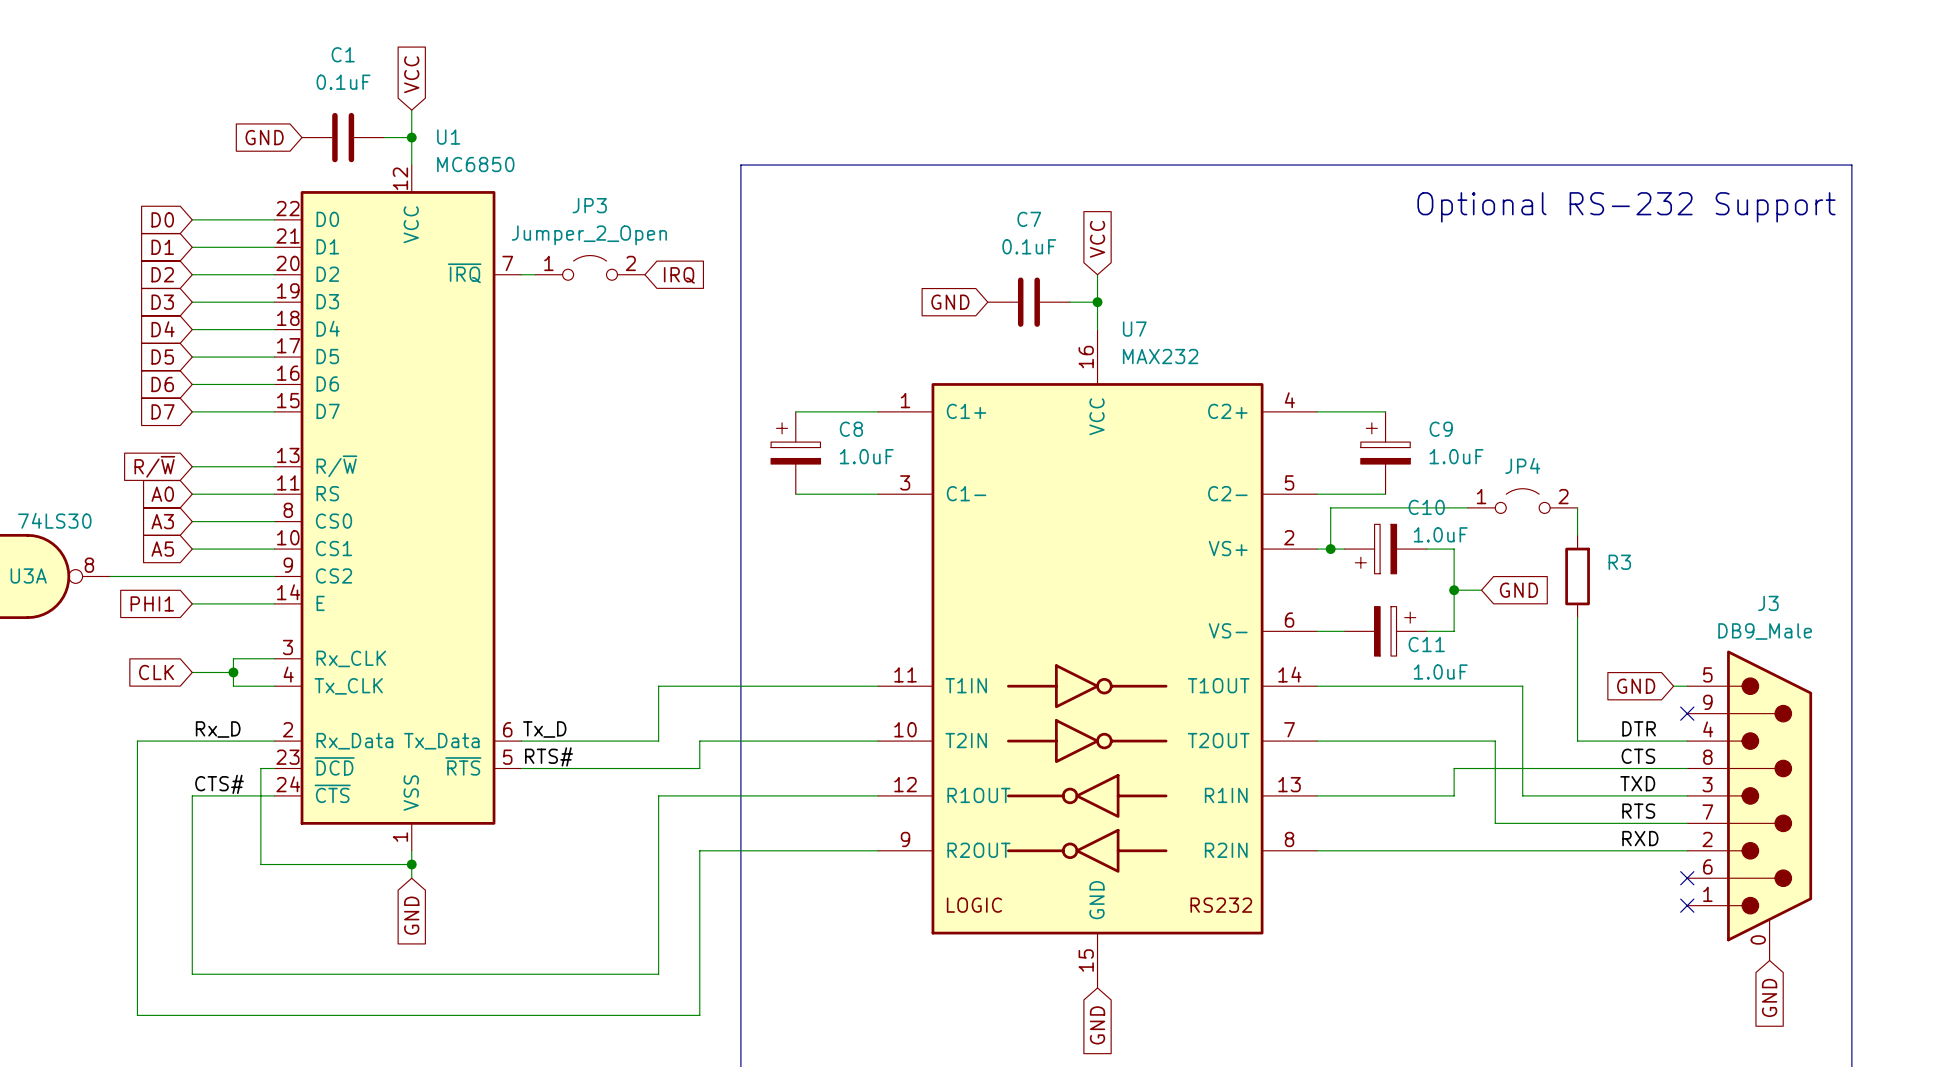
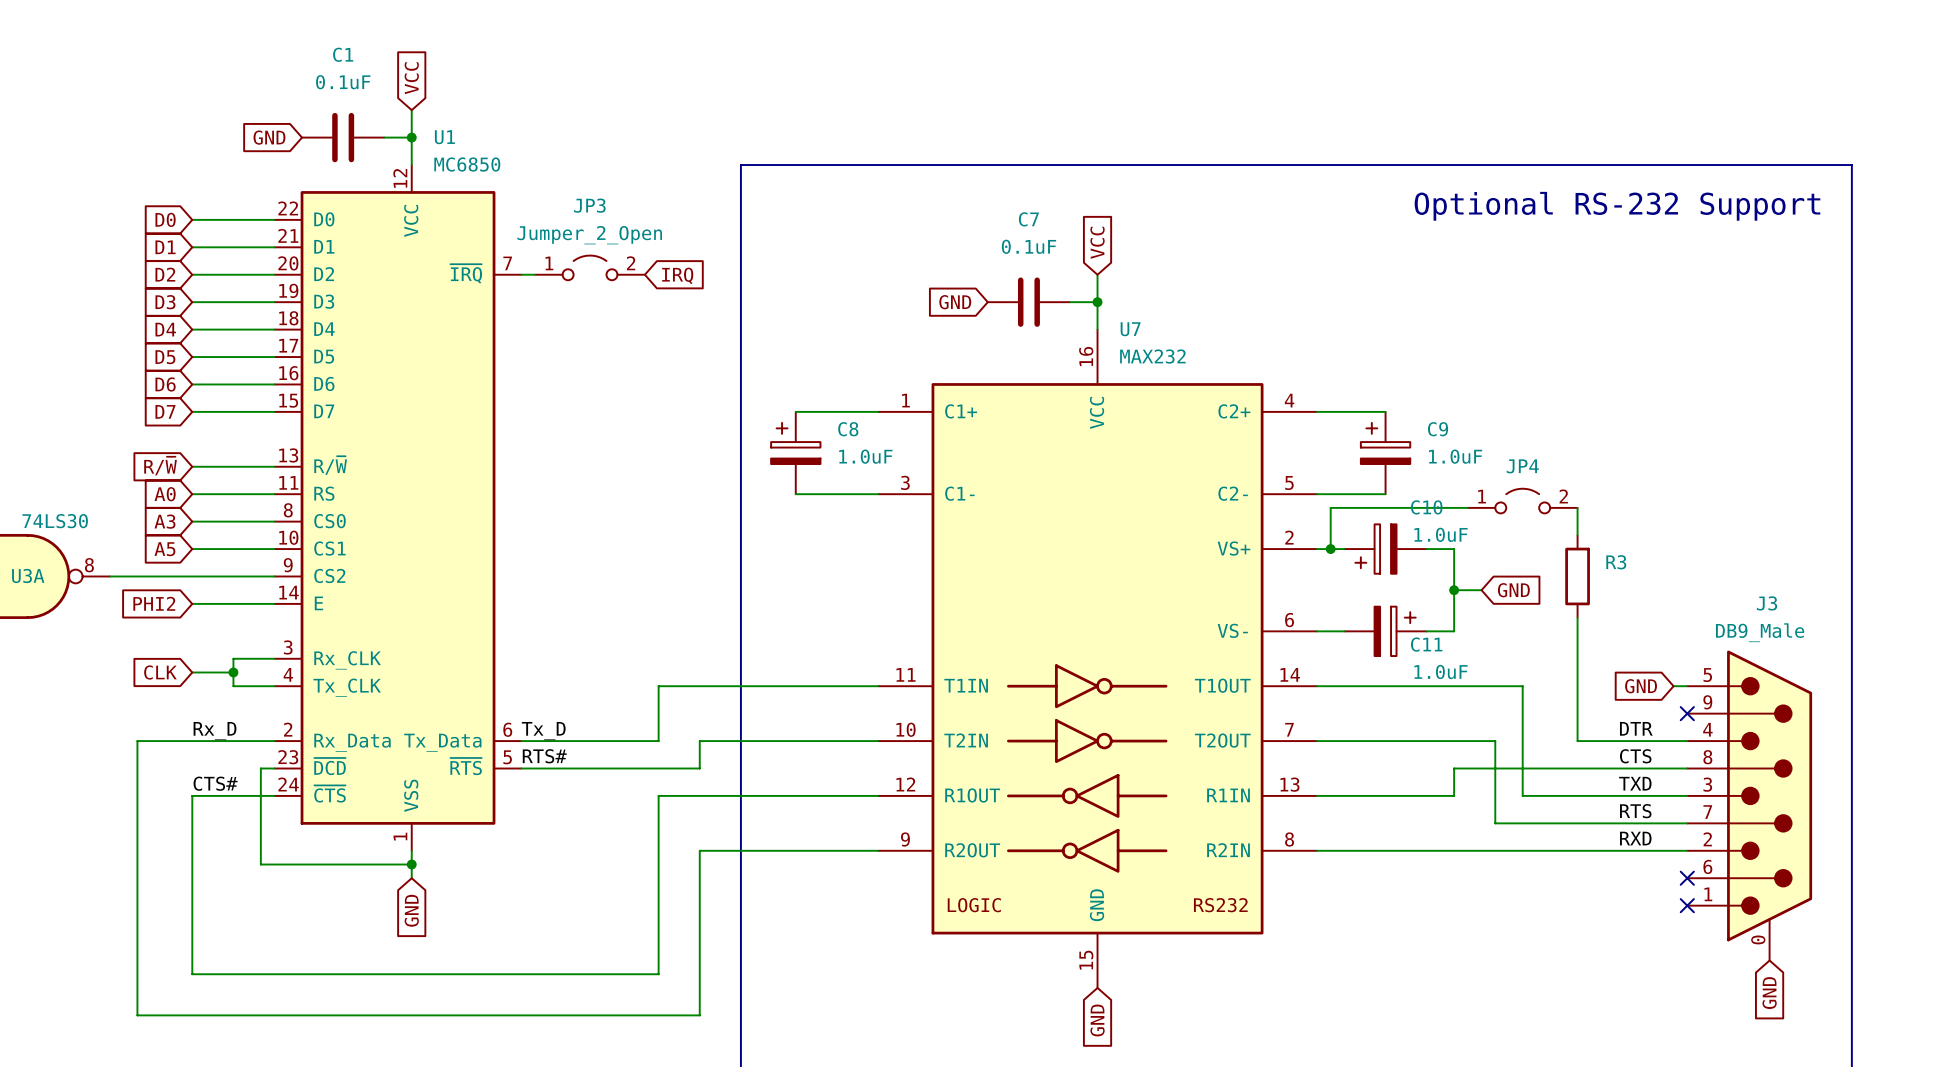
global label: PHI1 (152, 603) -> PHI2 (154, 603)

